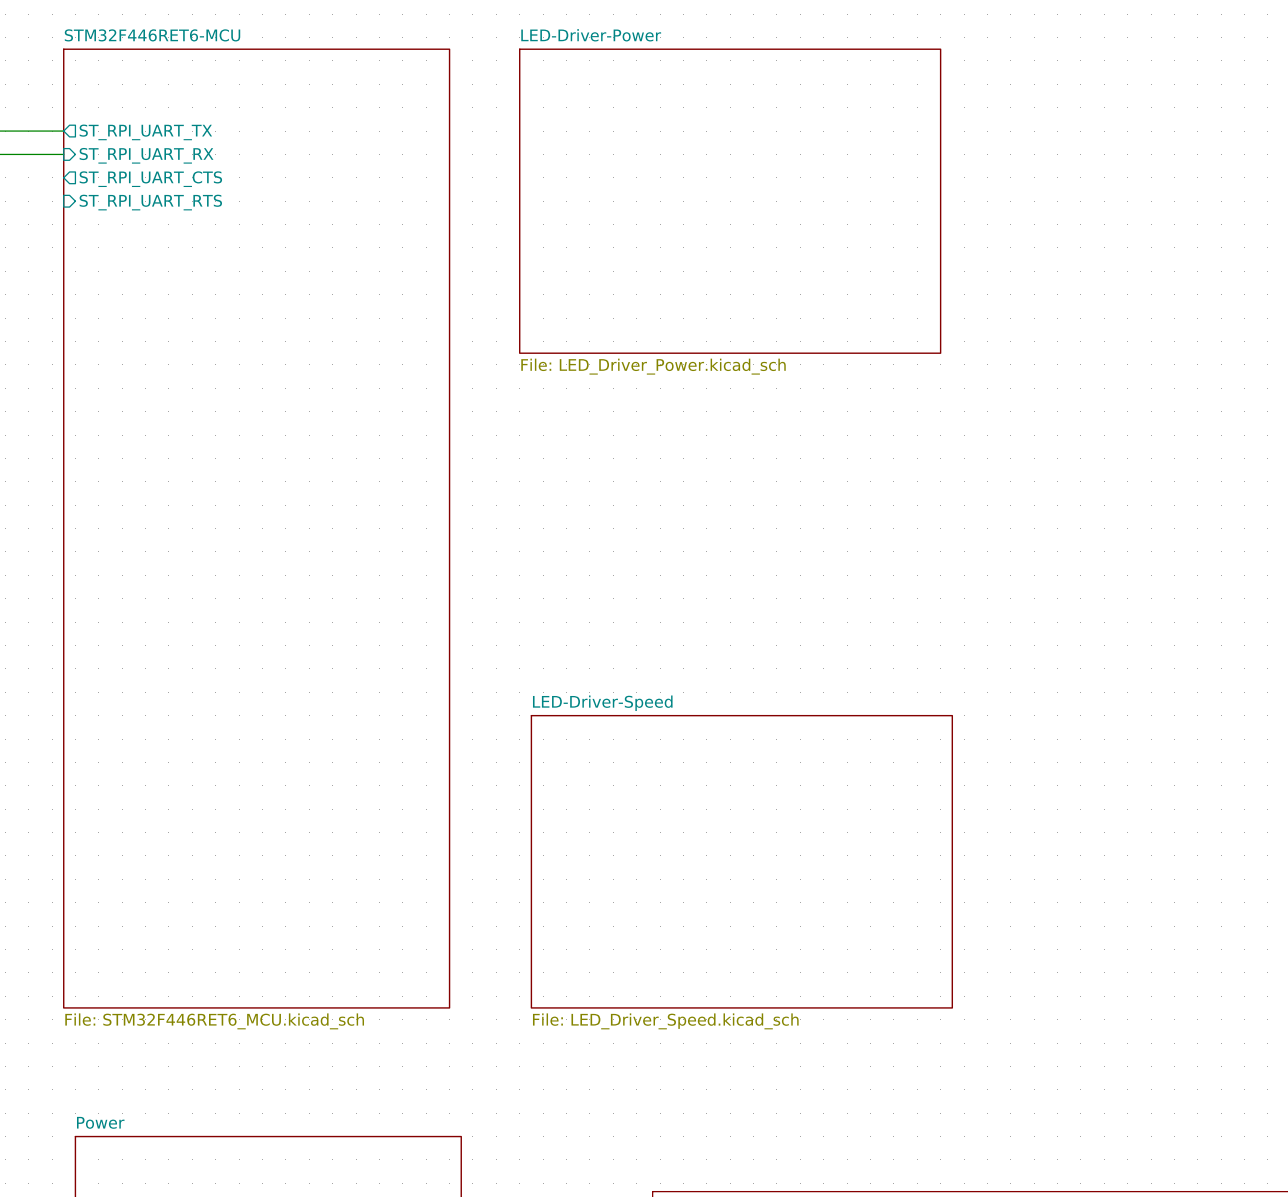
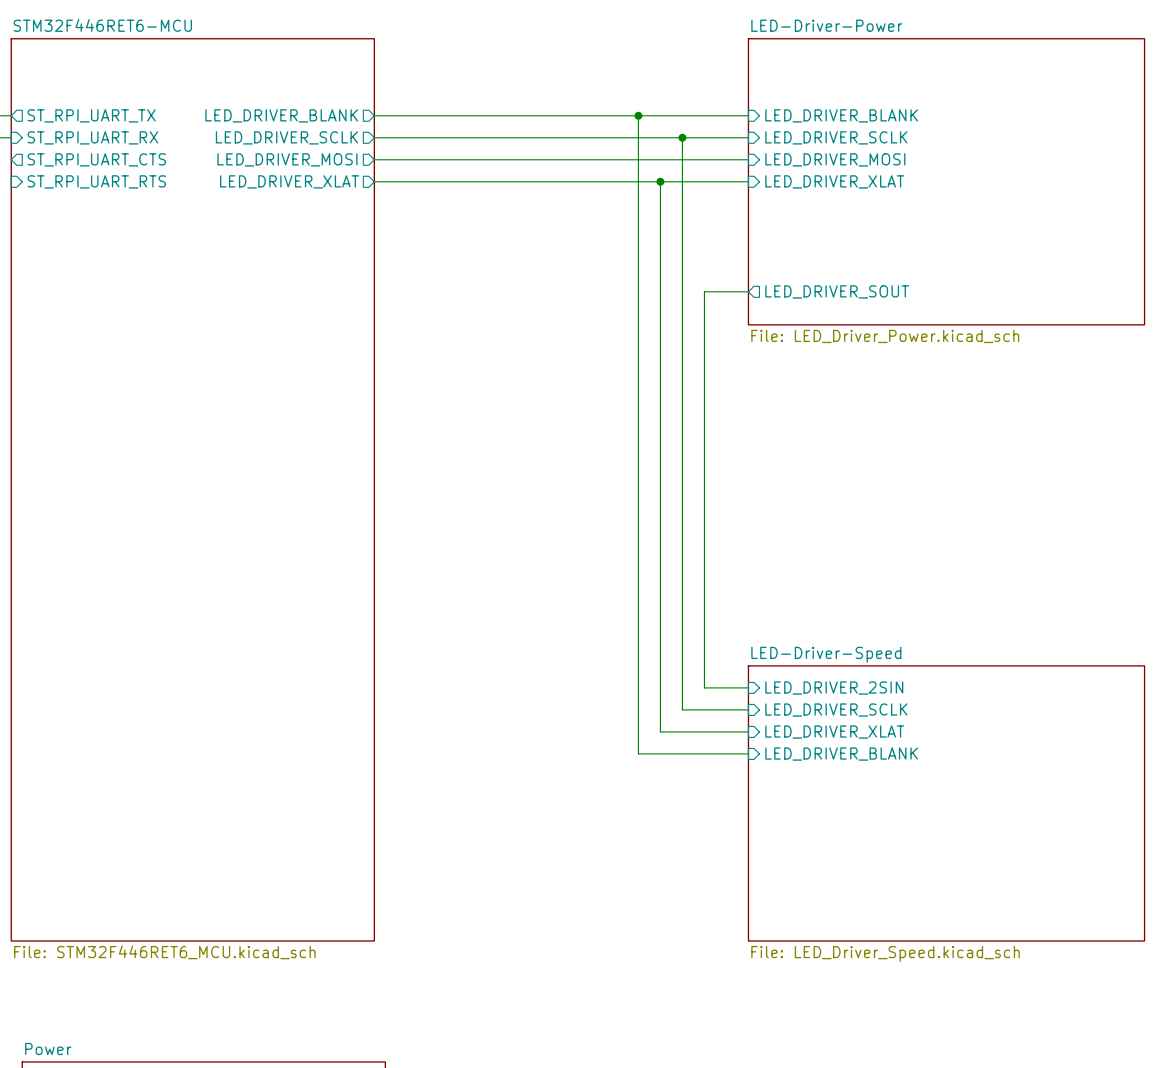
wire: none -> (374, 115) (748, 115)
wire: none -> (638, 115) (638, 753) (748, 753)
junction: none -> (638, 115)
sheet pin: none -> LED_DRIVER_BLANK (281, 115)
sheet pin: none -> LED_DRIVER_BLANK (841, 115)
wire: none -> (374, 137) (748, 137)
wire: none -> (682, 137) (682, 709) (748, 709)
junction: none -> (682, 137)
sheet pin: none -> LED_DRIVER_SCLK (286, 137)
sheet pin: none -> LED_DRIVER_SCLK (836, 137)
wire: none -> (374, 159) (748, 159)
sheet pin: none -> LED_DRIVER_MOSI (287, 159)
sheet pin: none -> LED_DRIVER_MOSI (835, 159)
wire: none -> (374, 181) (748, 181)
sheet LED-Driver-Power: File: LED_Driver_Power.kicad_sch (730, 201) -> none
wire: none -> (660, 181) (660, 731) (748, 731)
junction: none -> (660, 181)
sheet LED-Driver-Power: none -> File: LED_Driver_Power.kicad_sch (946, 181)
sheet pin: none -> LED_DRIVER_XLAT (289, 181)
sheet pin: none -> LED_DRIVER_XLAT (834, 181)
wire: none -> (748, 291) (704, 291) (704, 687) (748, 687)
sheet pin: none -> LED_DRIVER_SOUT (837, 291)
sheet pin: none -> LED_DRIVER_2SIN (834, 688)
sheet pin: none -> LED_DRIVER_SCLK (836, 710)
sheet pin: none -> LED_DRIVER_XLAT (834, 732)
sheet pin: none -> LED_DRIVER_BLANK (841, 754)
sheet LED-Driver-Speed: File: LED_Driver_Speed.kicad_sch (741, 861) -> none
sheet LED-Driver-Speed: none -> File: LED_Driver_Speed.kicad_sch (946, 803)

